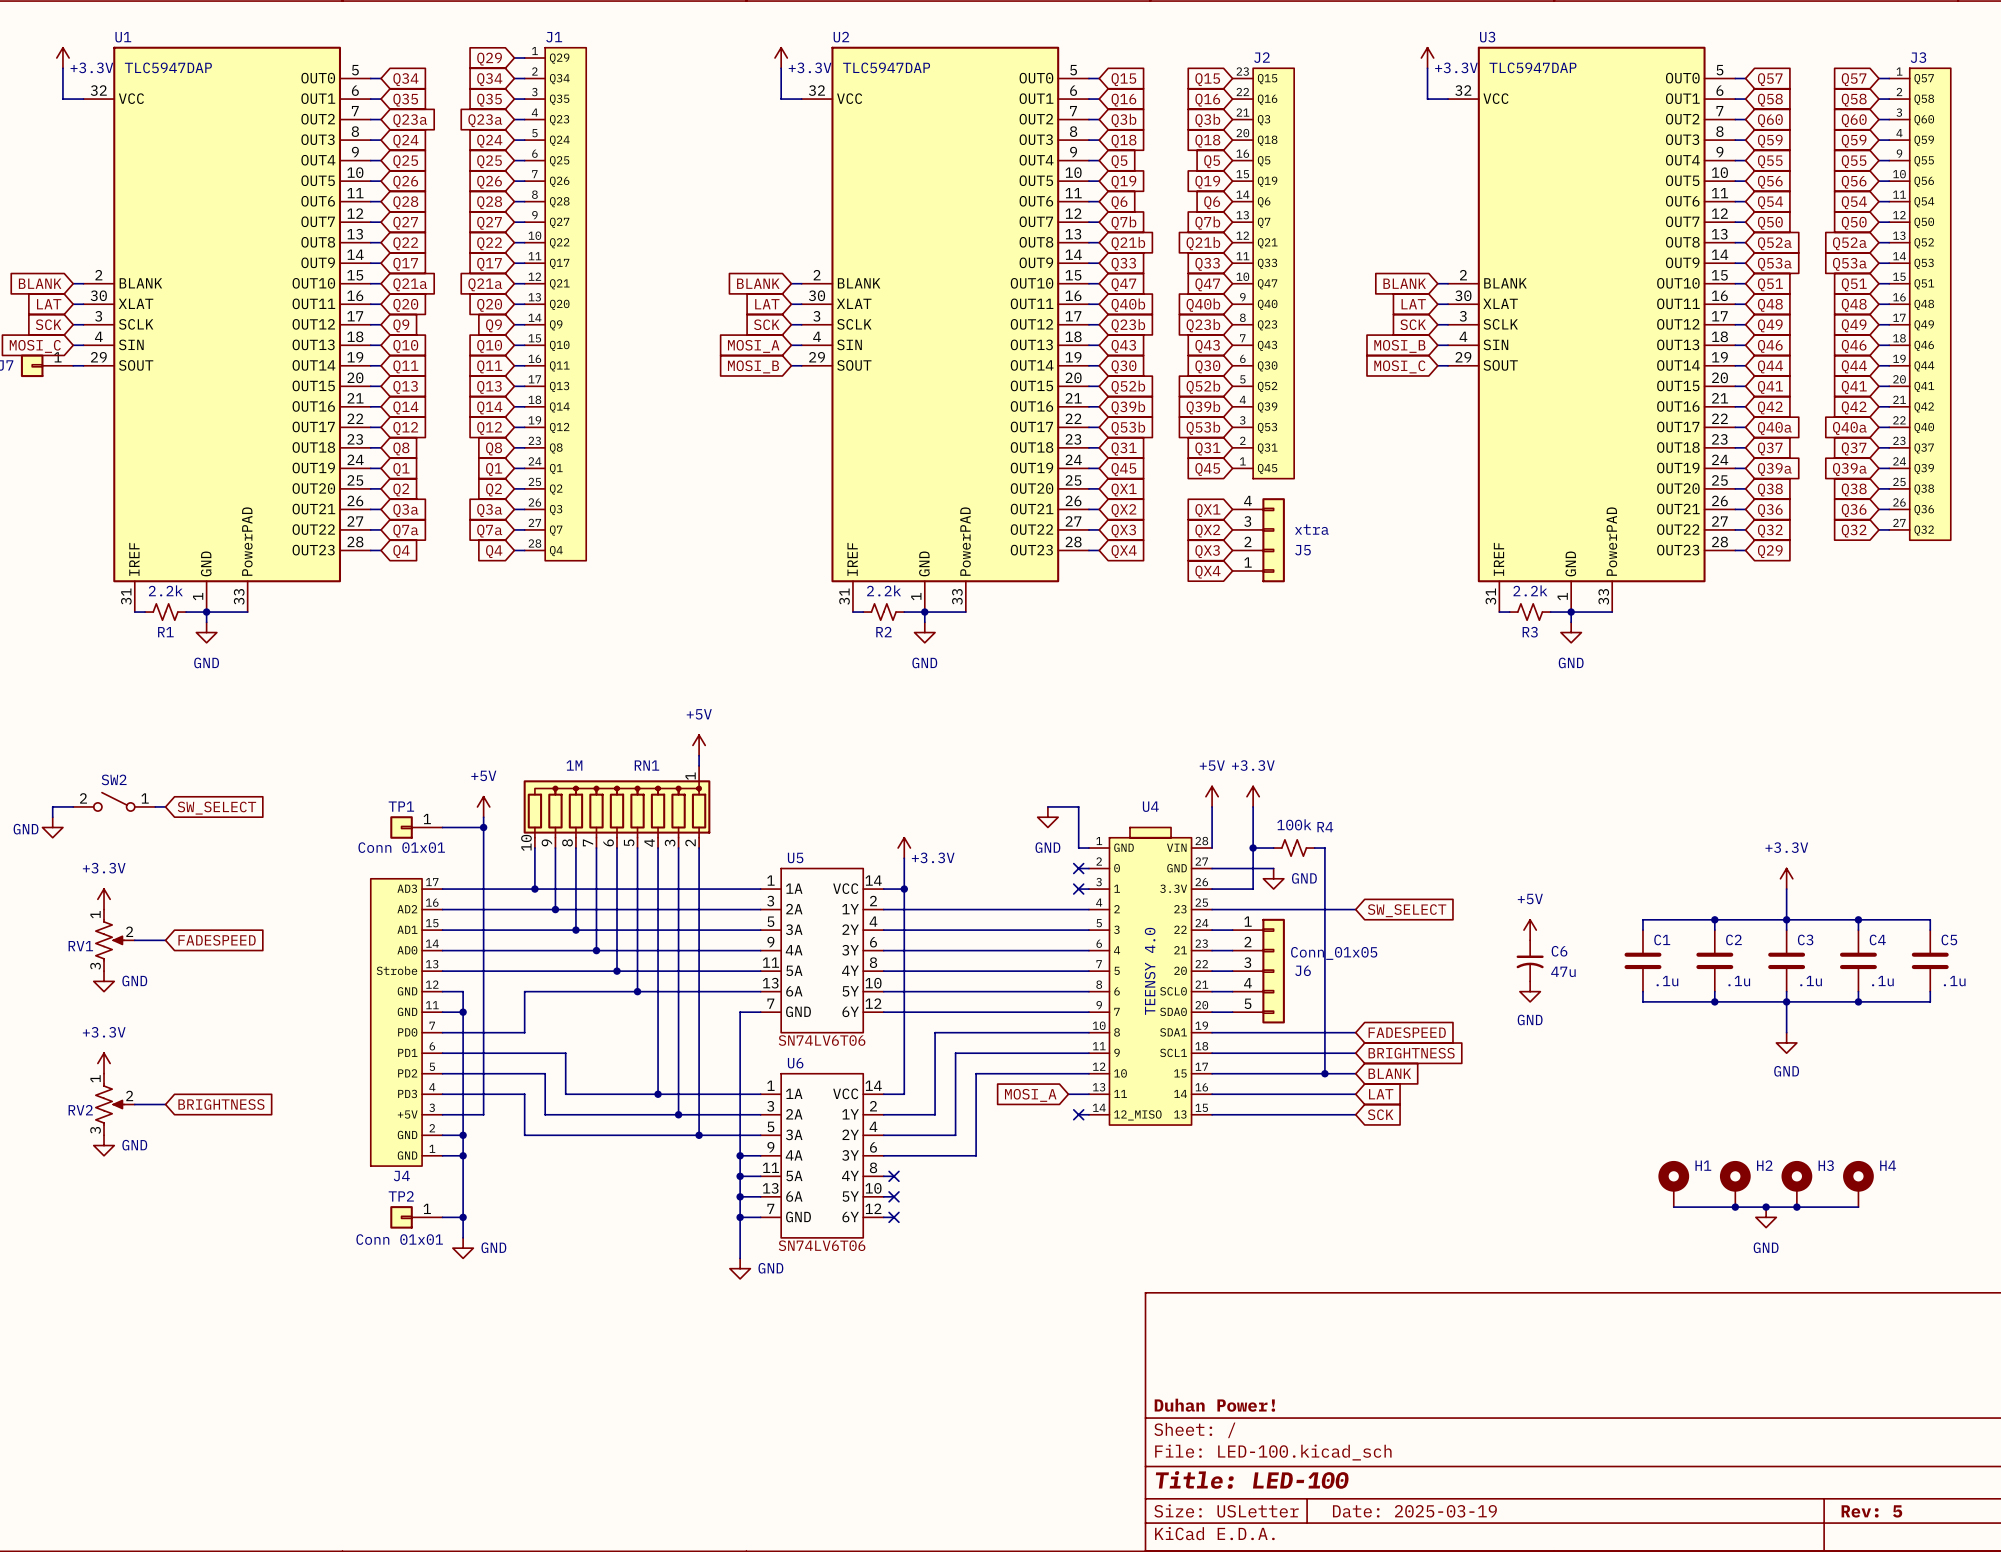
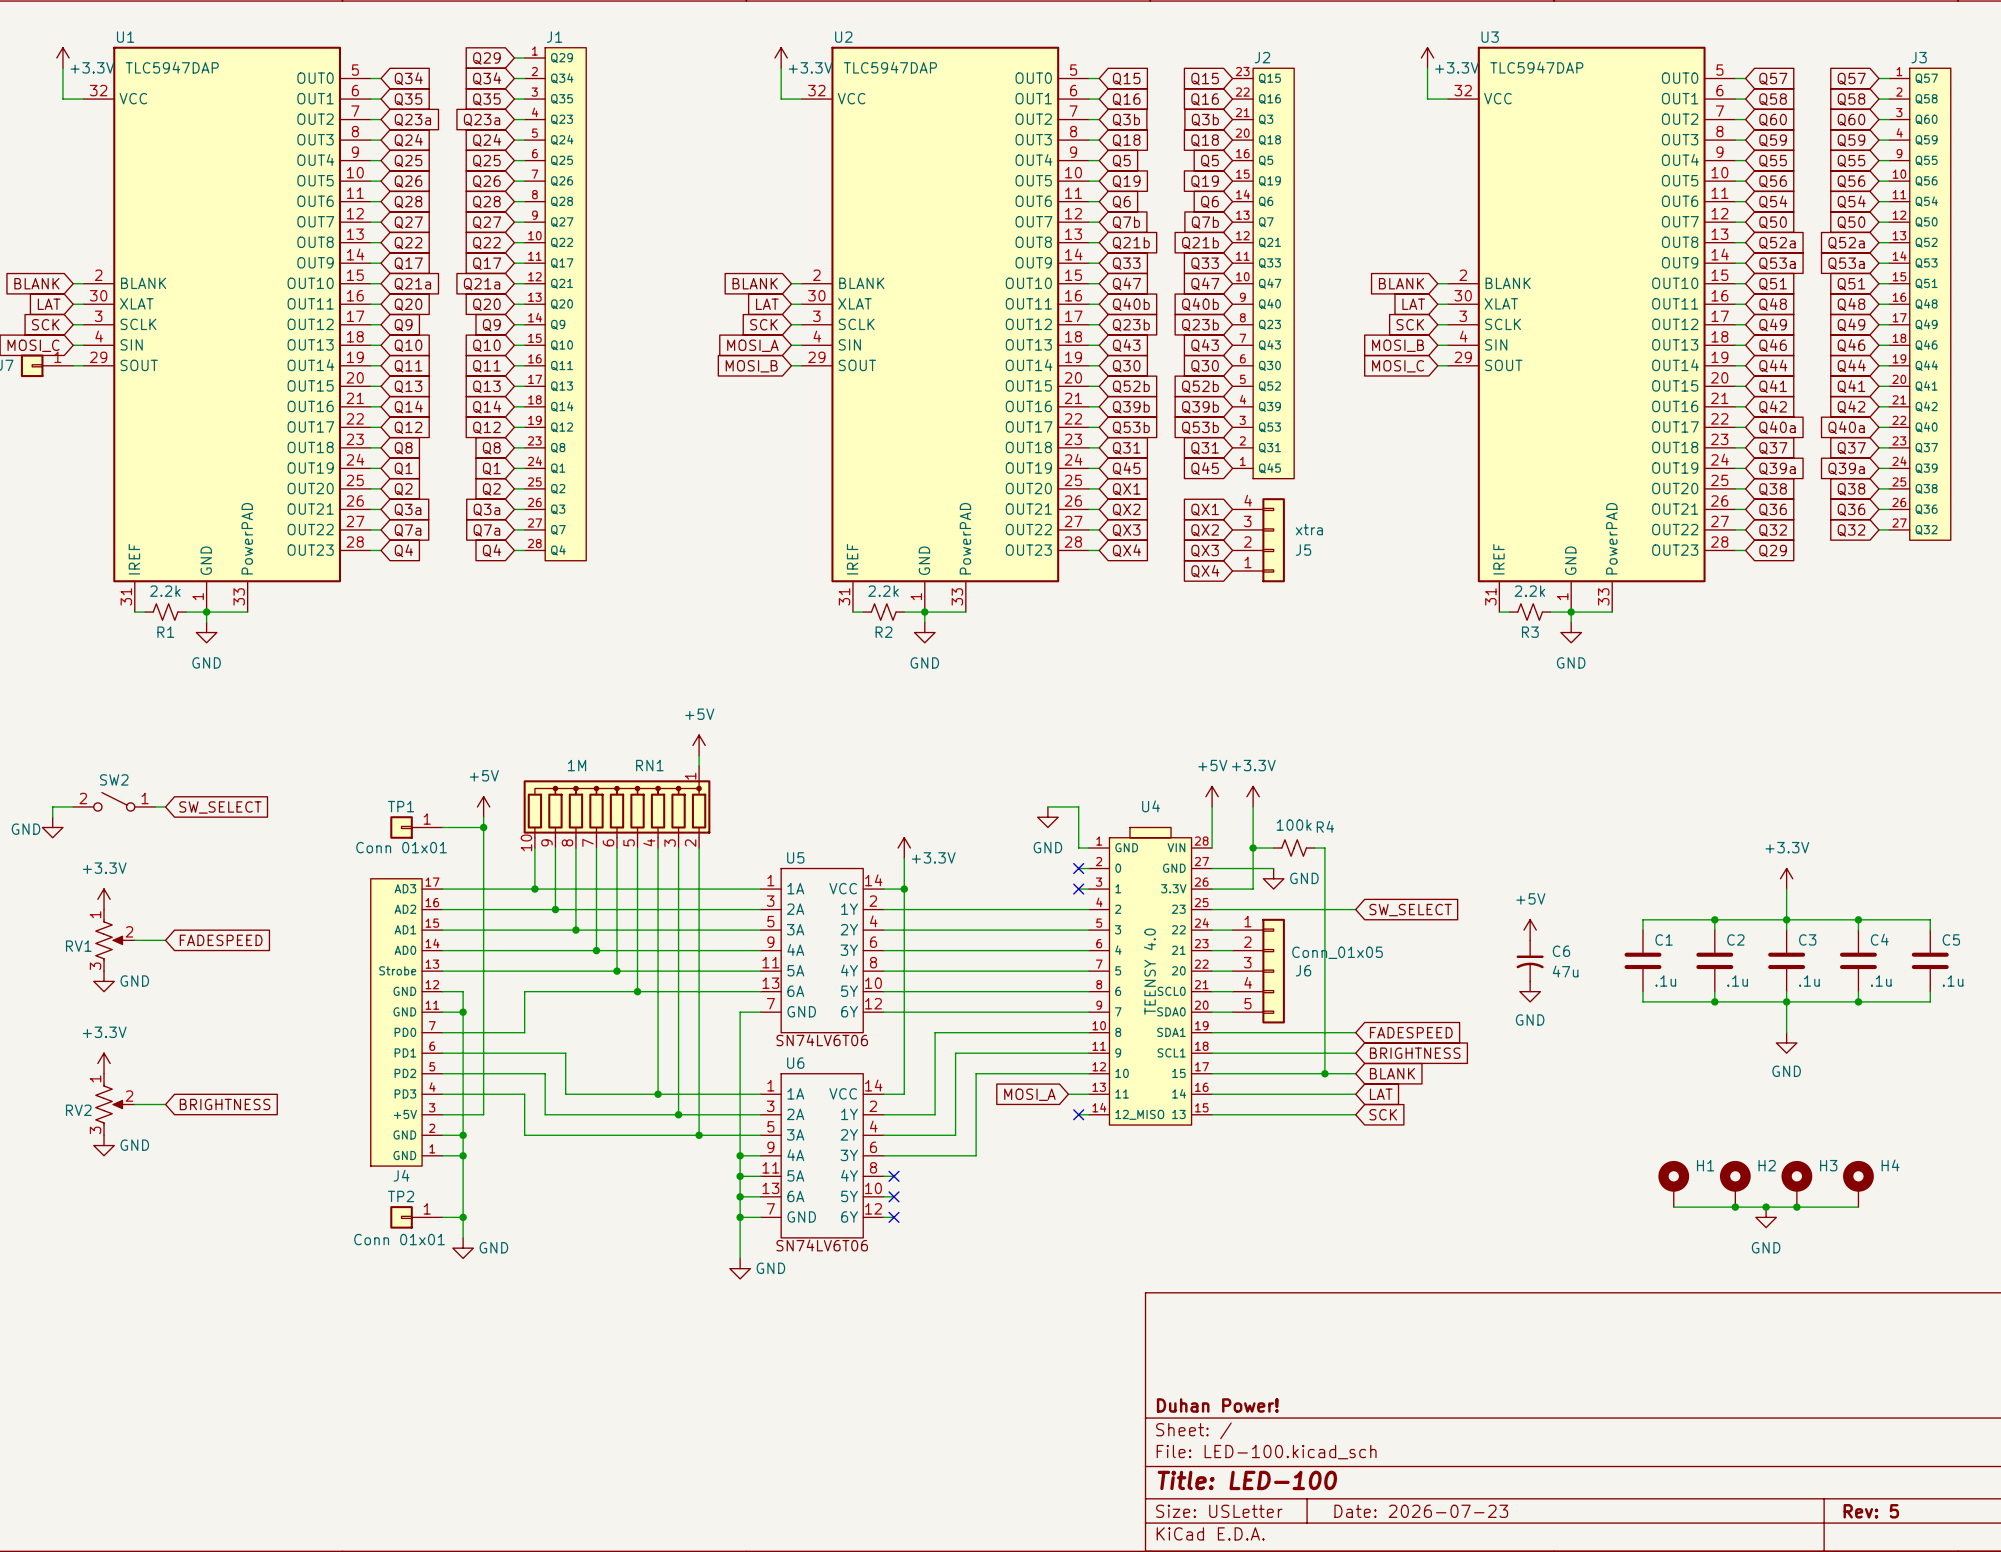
title block: Date: 2025-03-19 (1414, 1511) -> Date: 2026-07-23 (1421, 1511)

